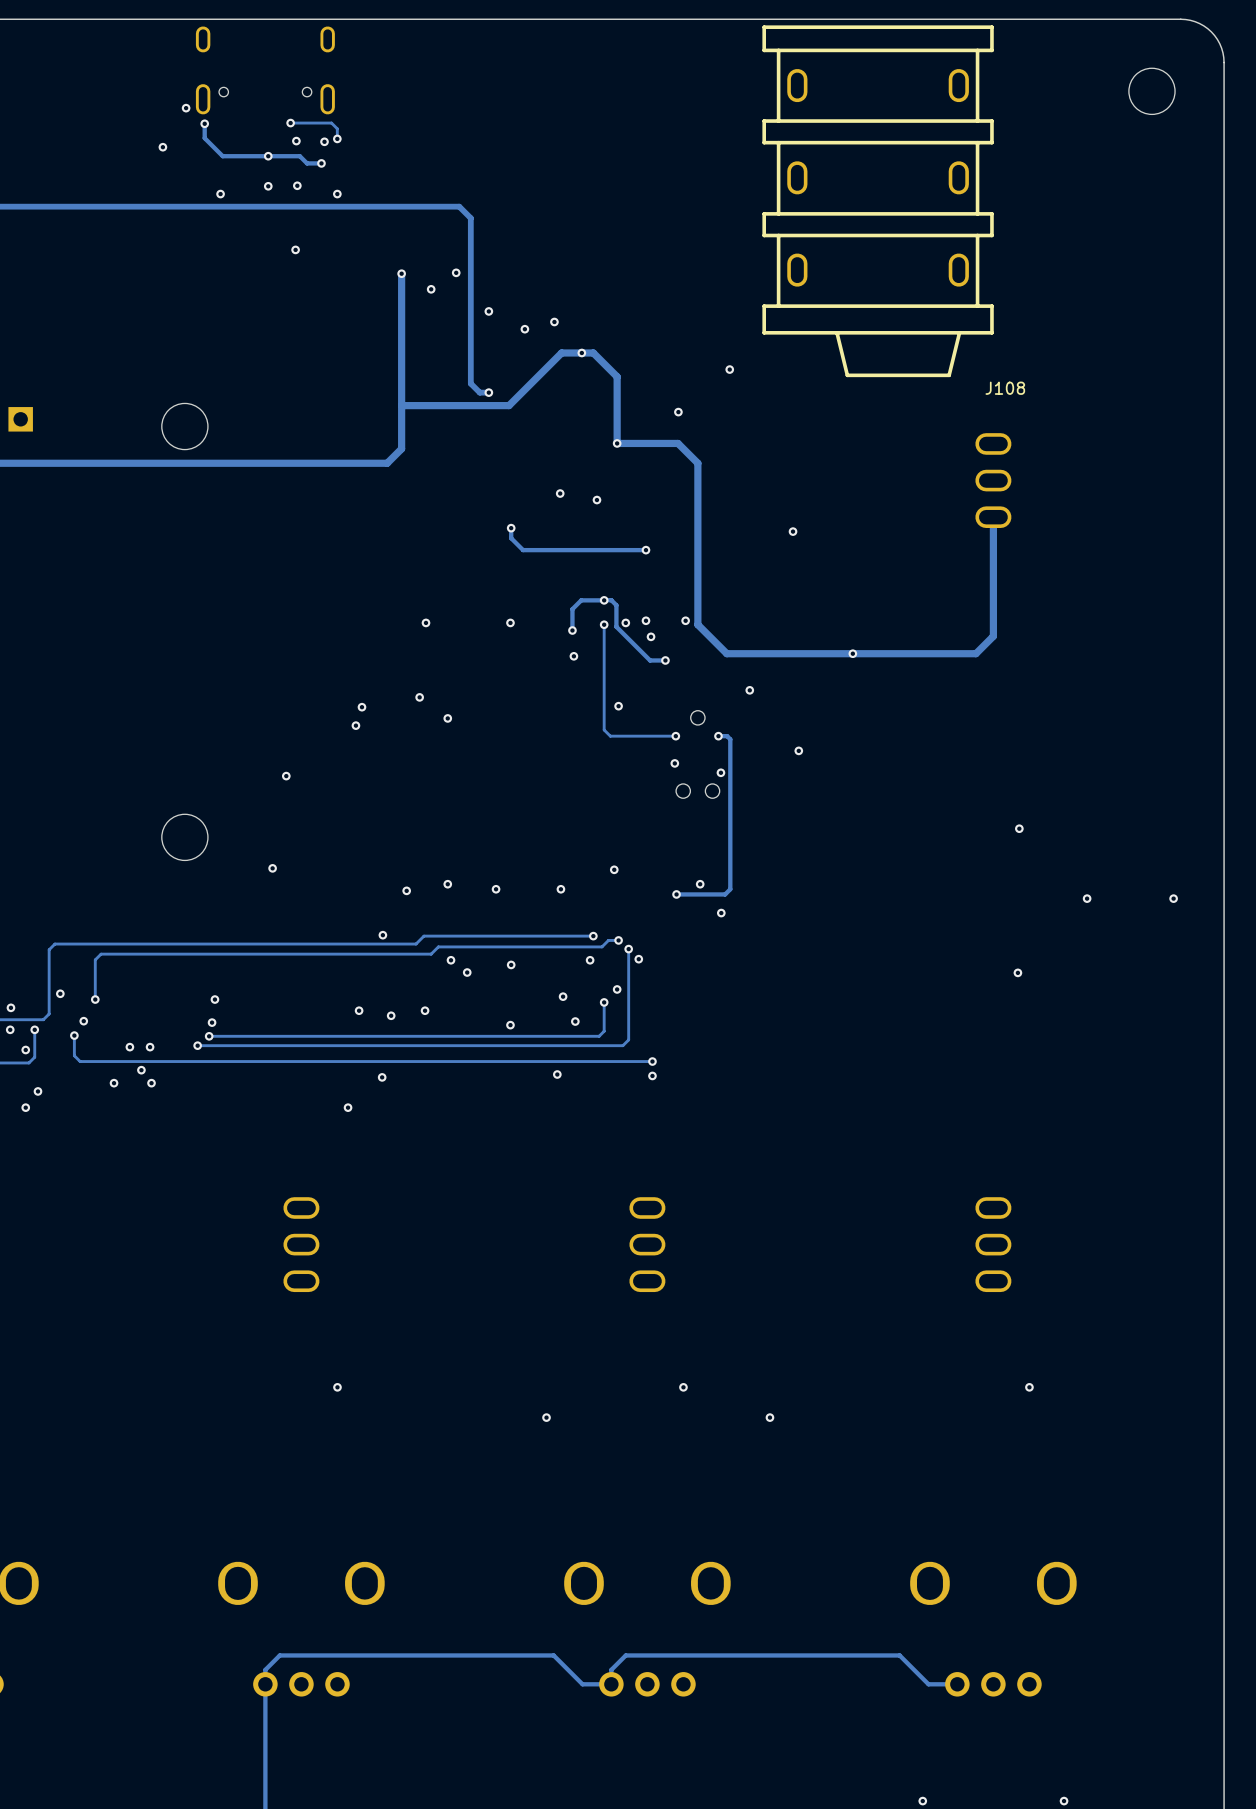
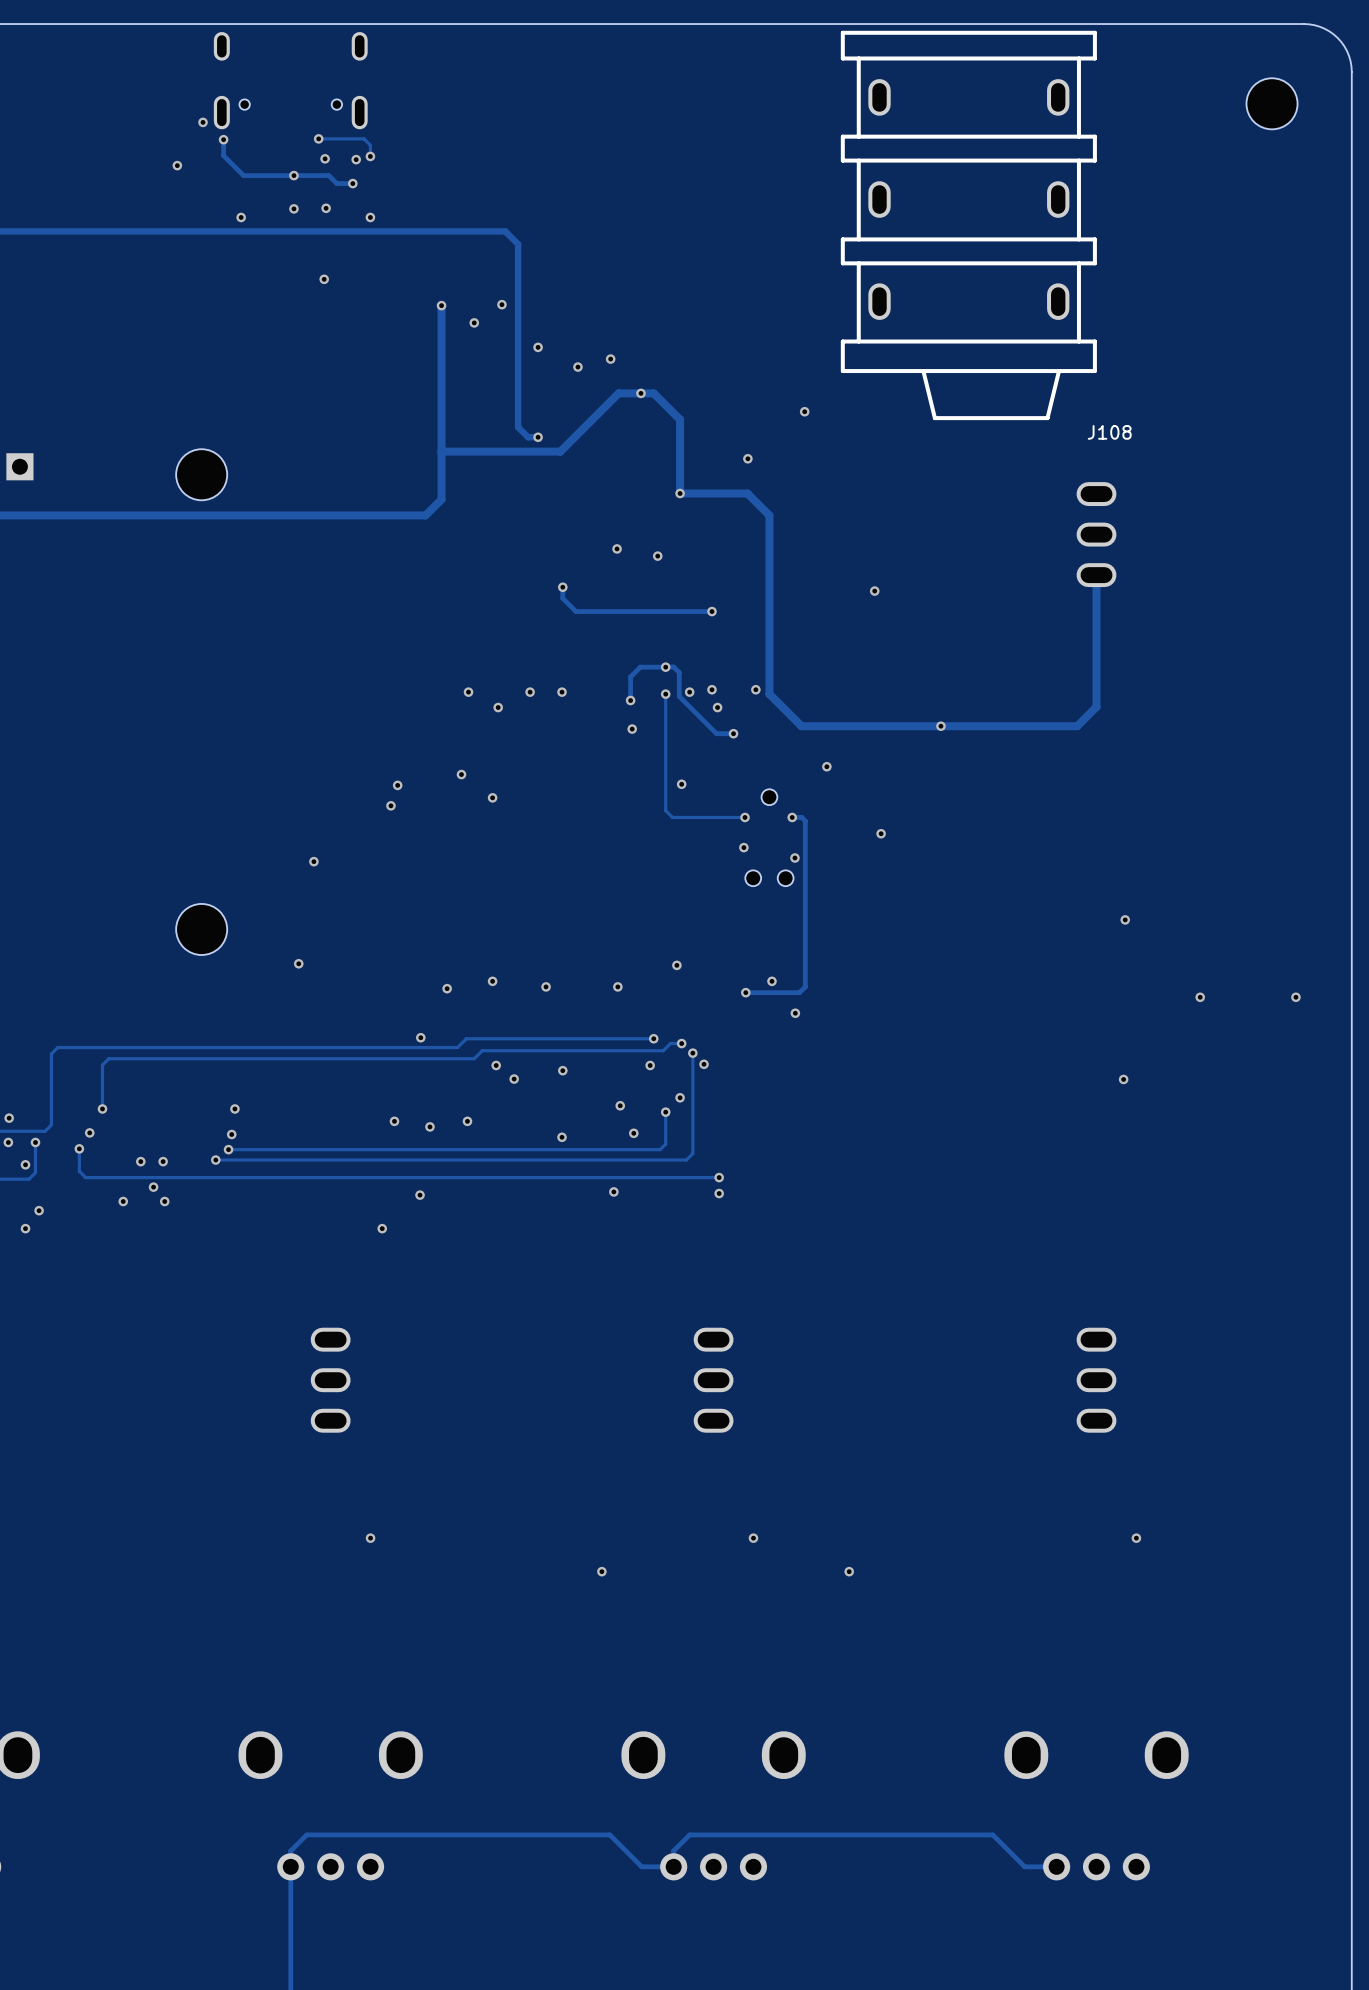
via: none -> (530, 692)
via: none -> (498, 707)
via: (60, 993) -> none

